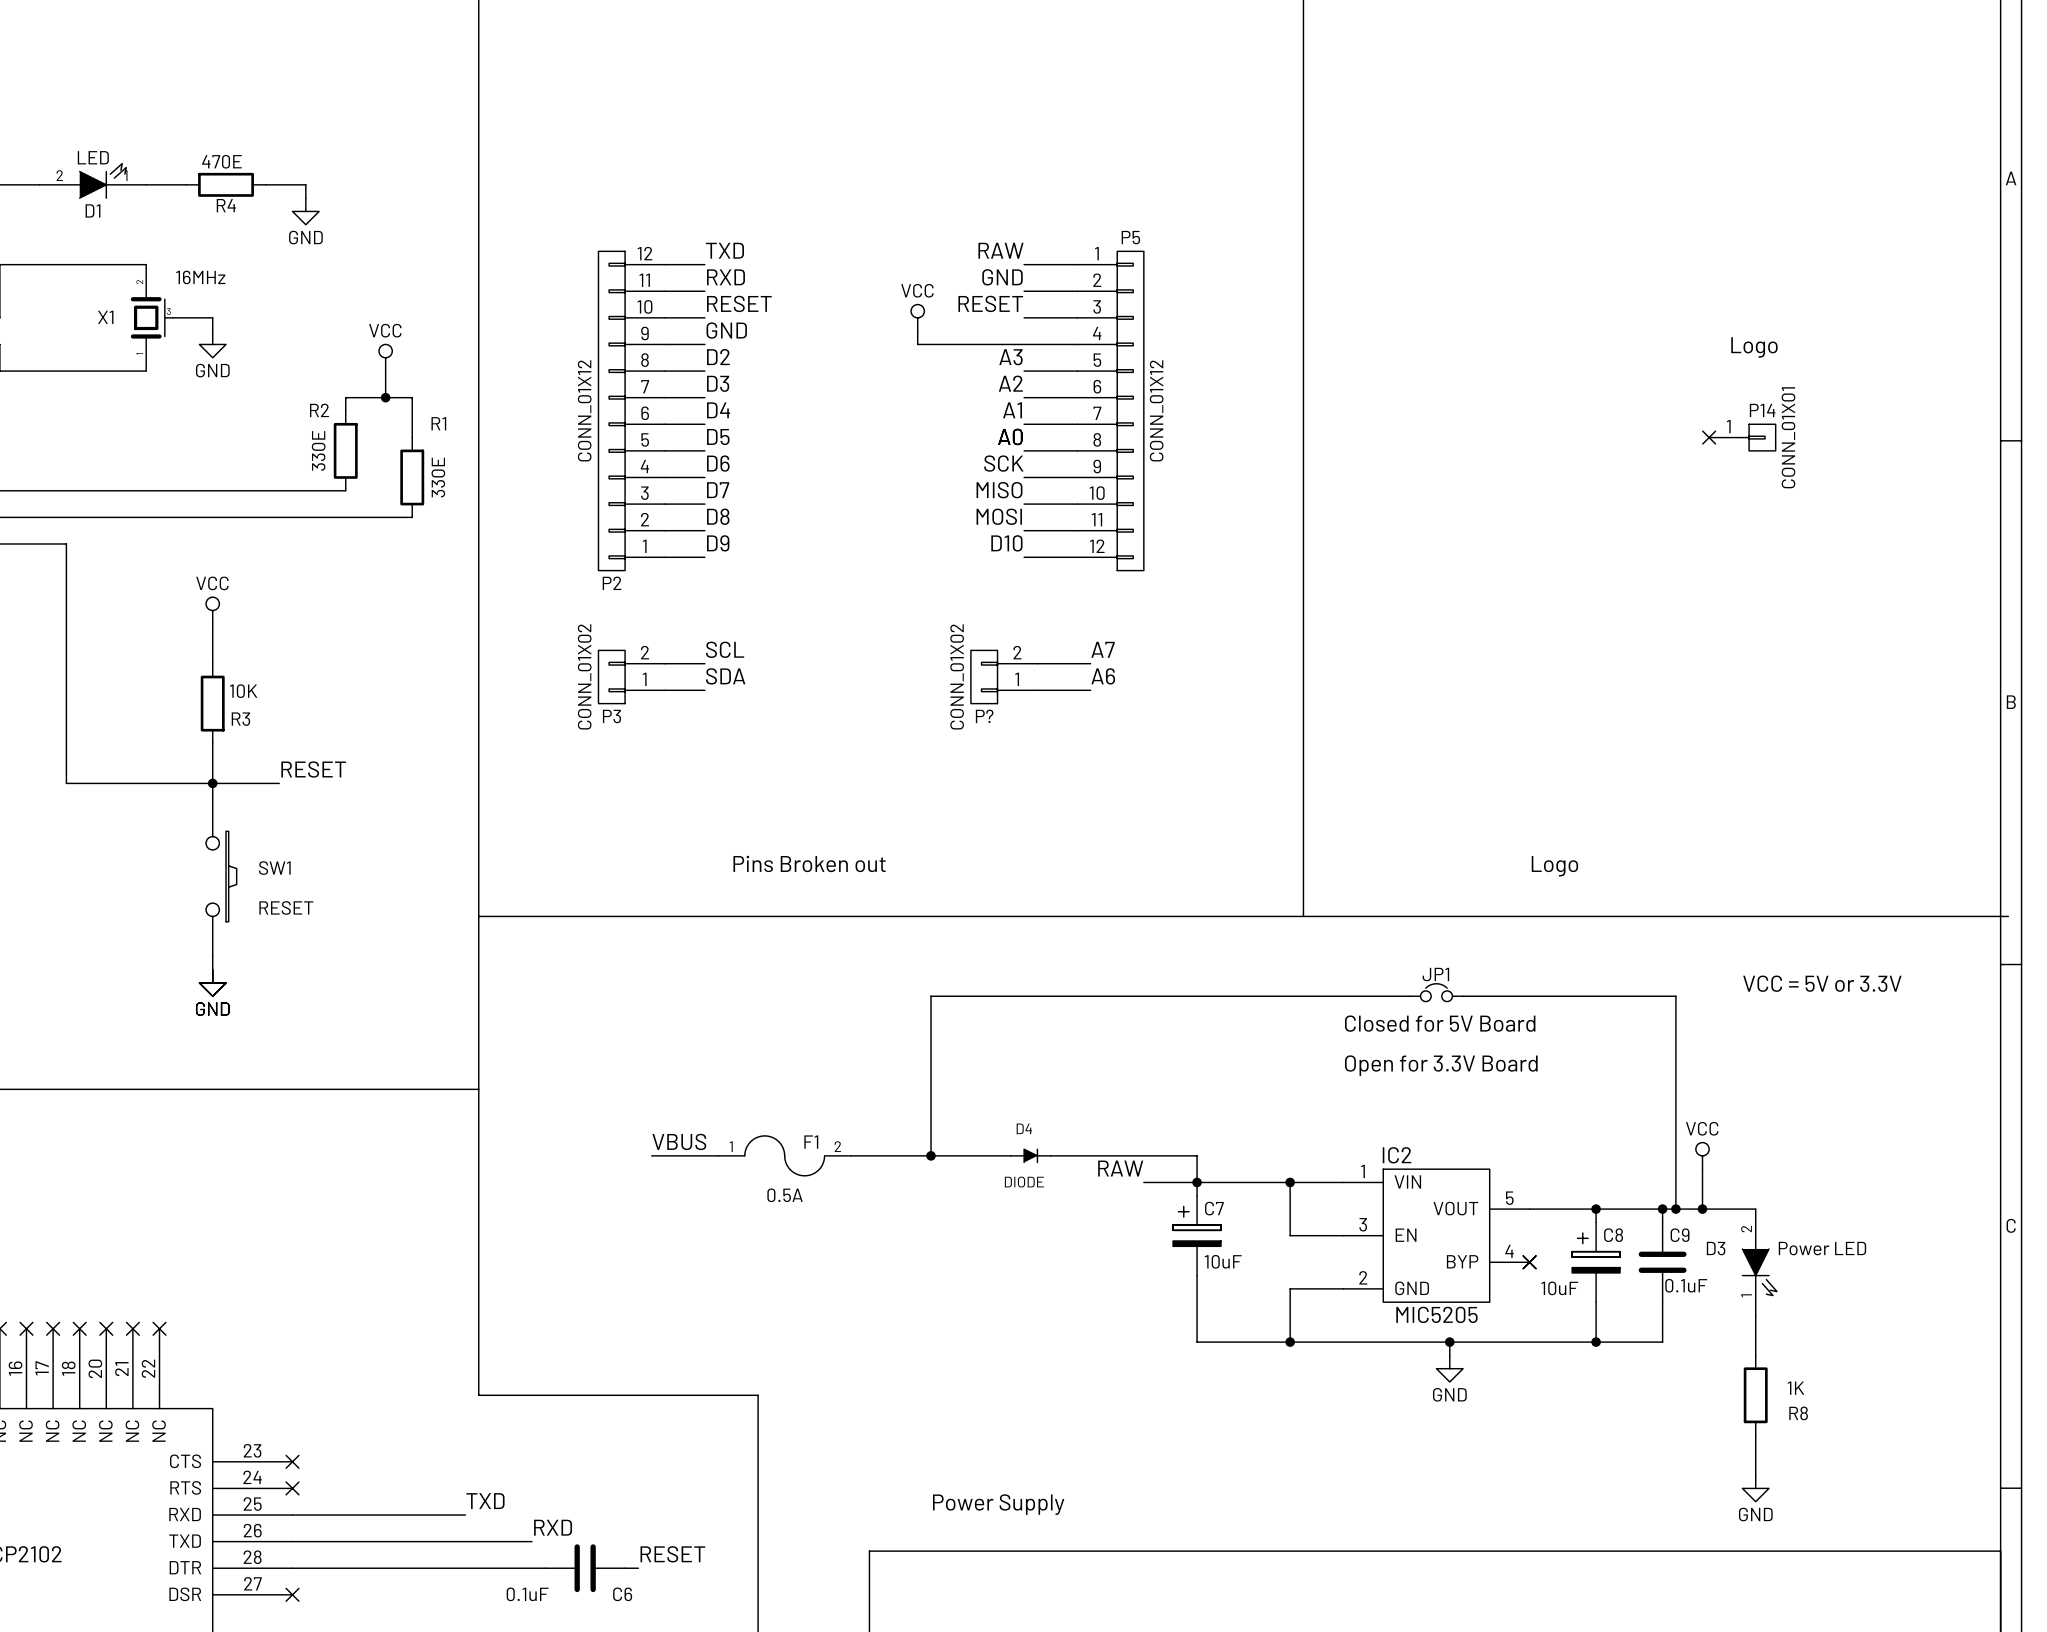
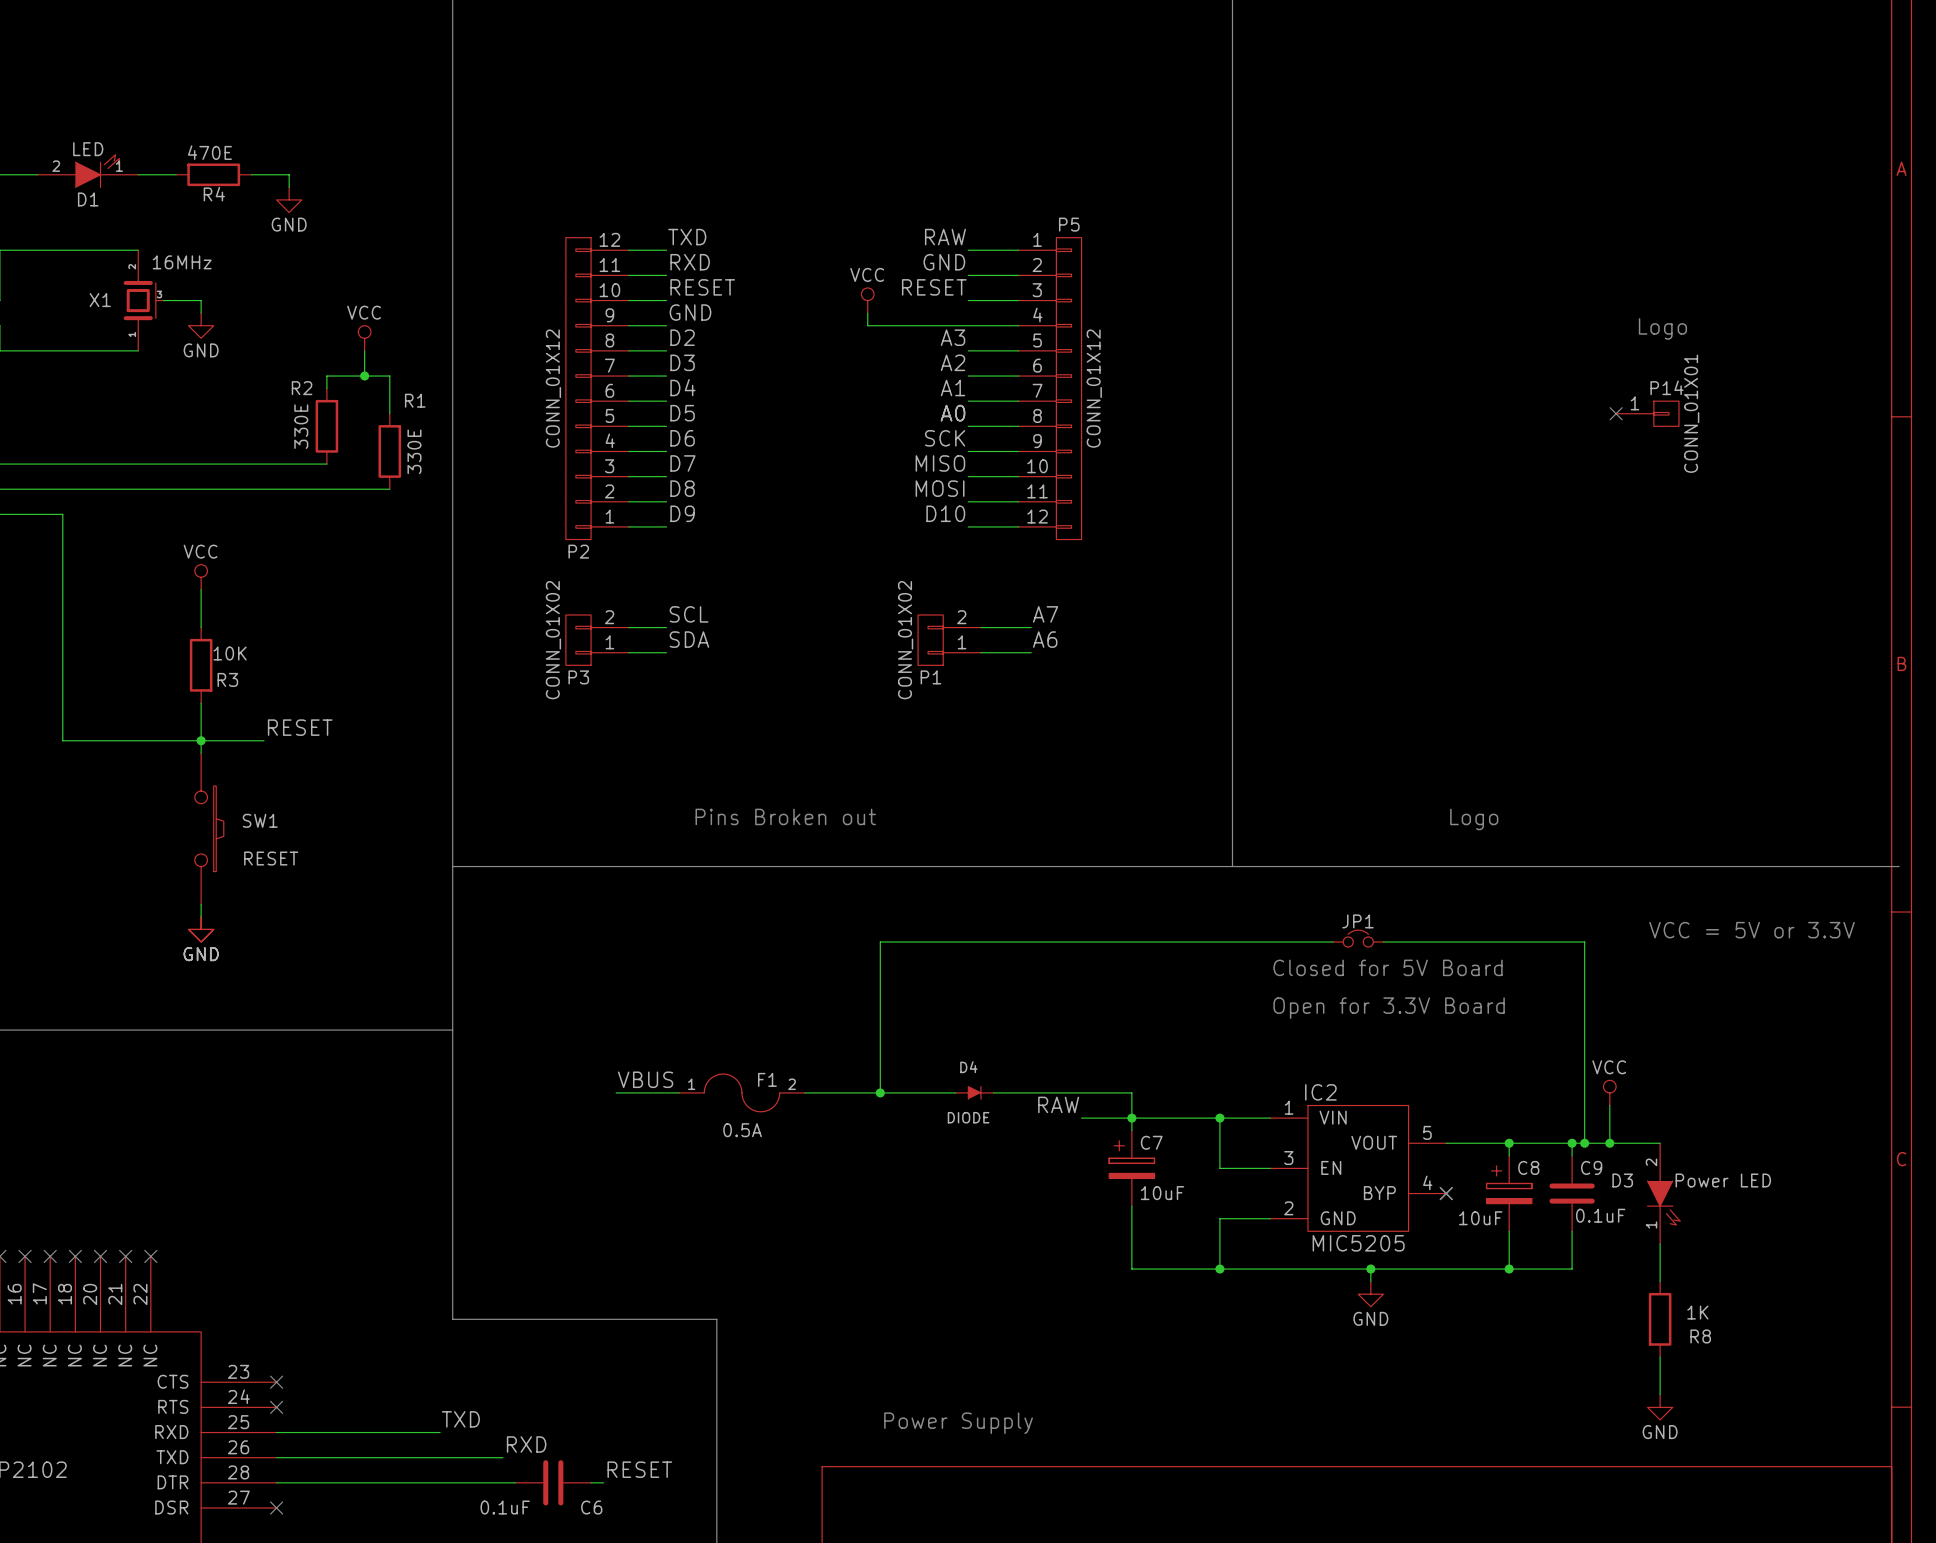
P? name: P? (984, 716) -> P1 (930, 677)

